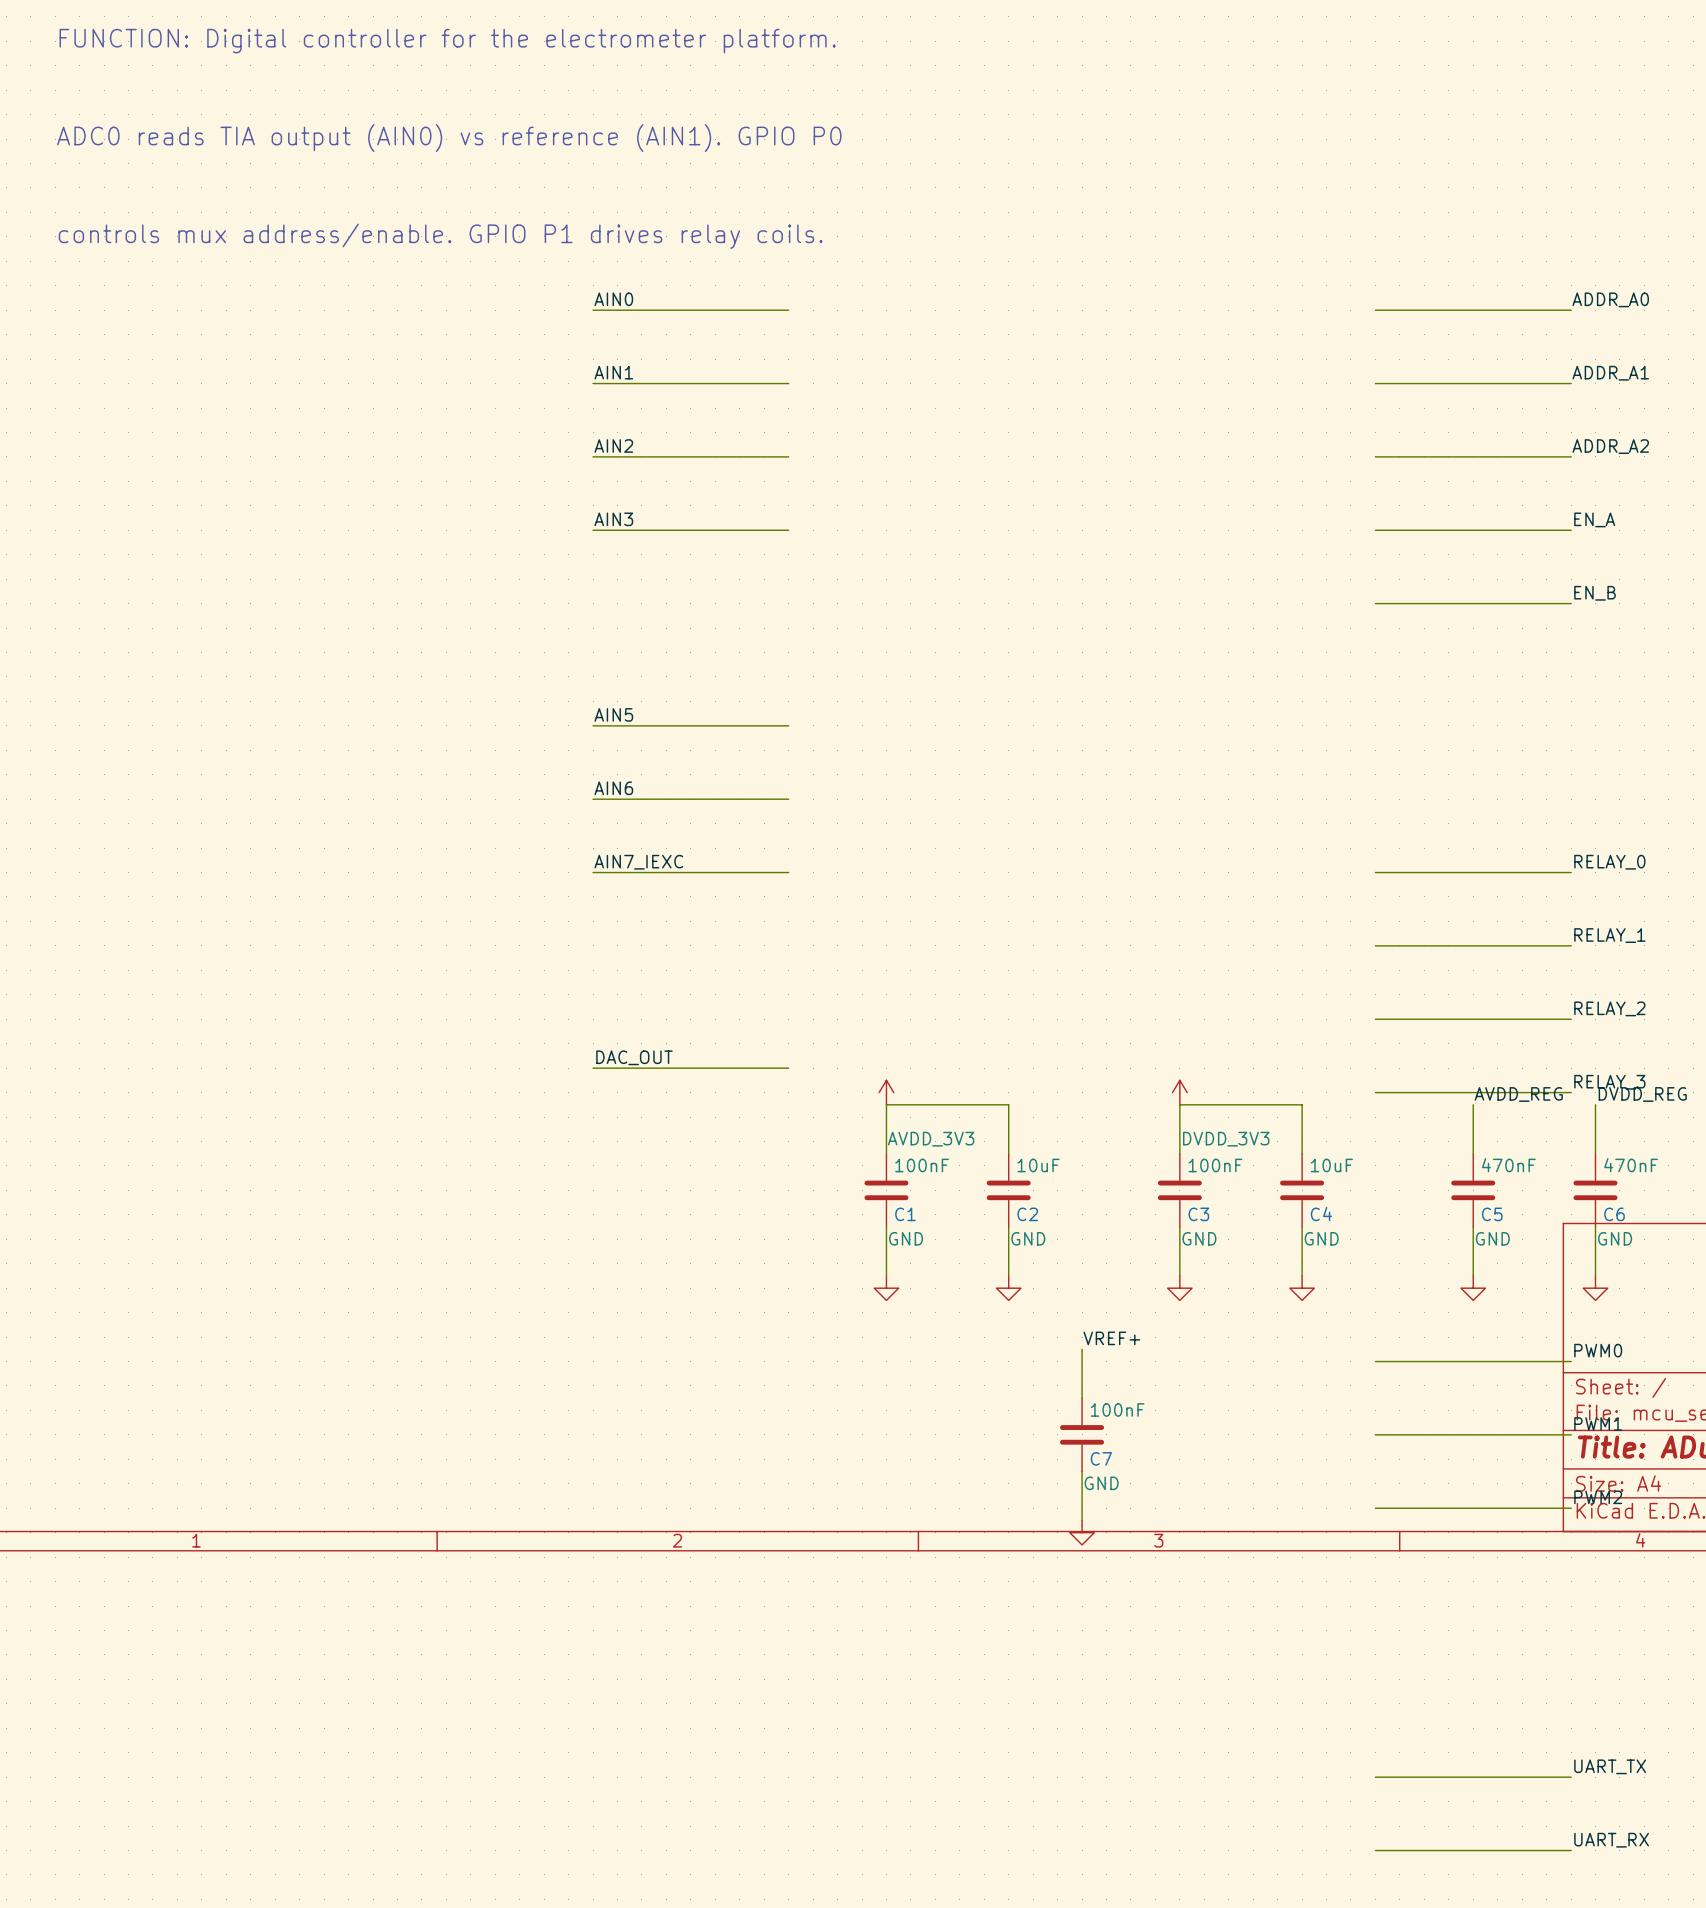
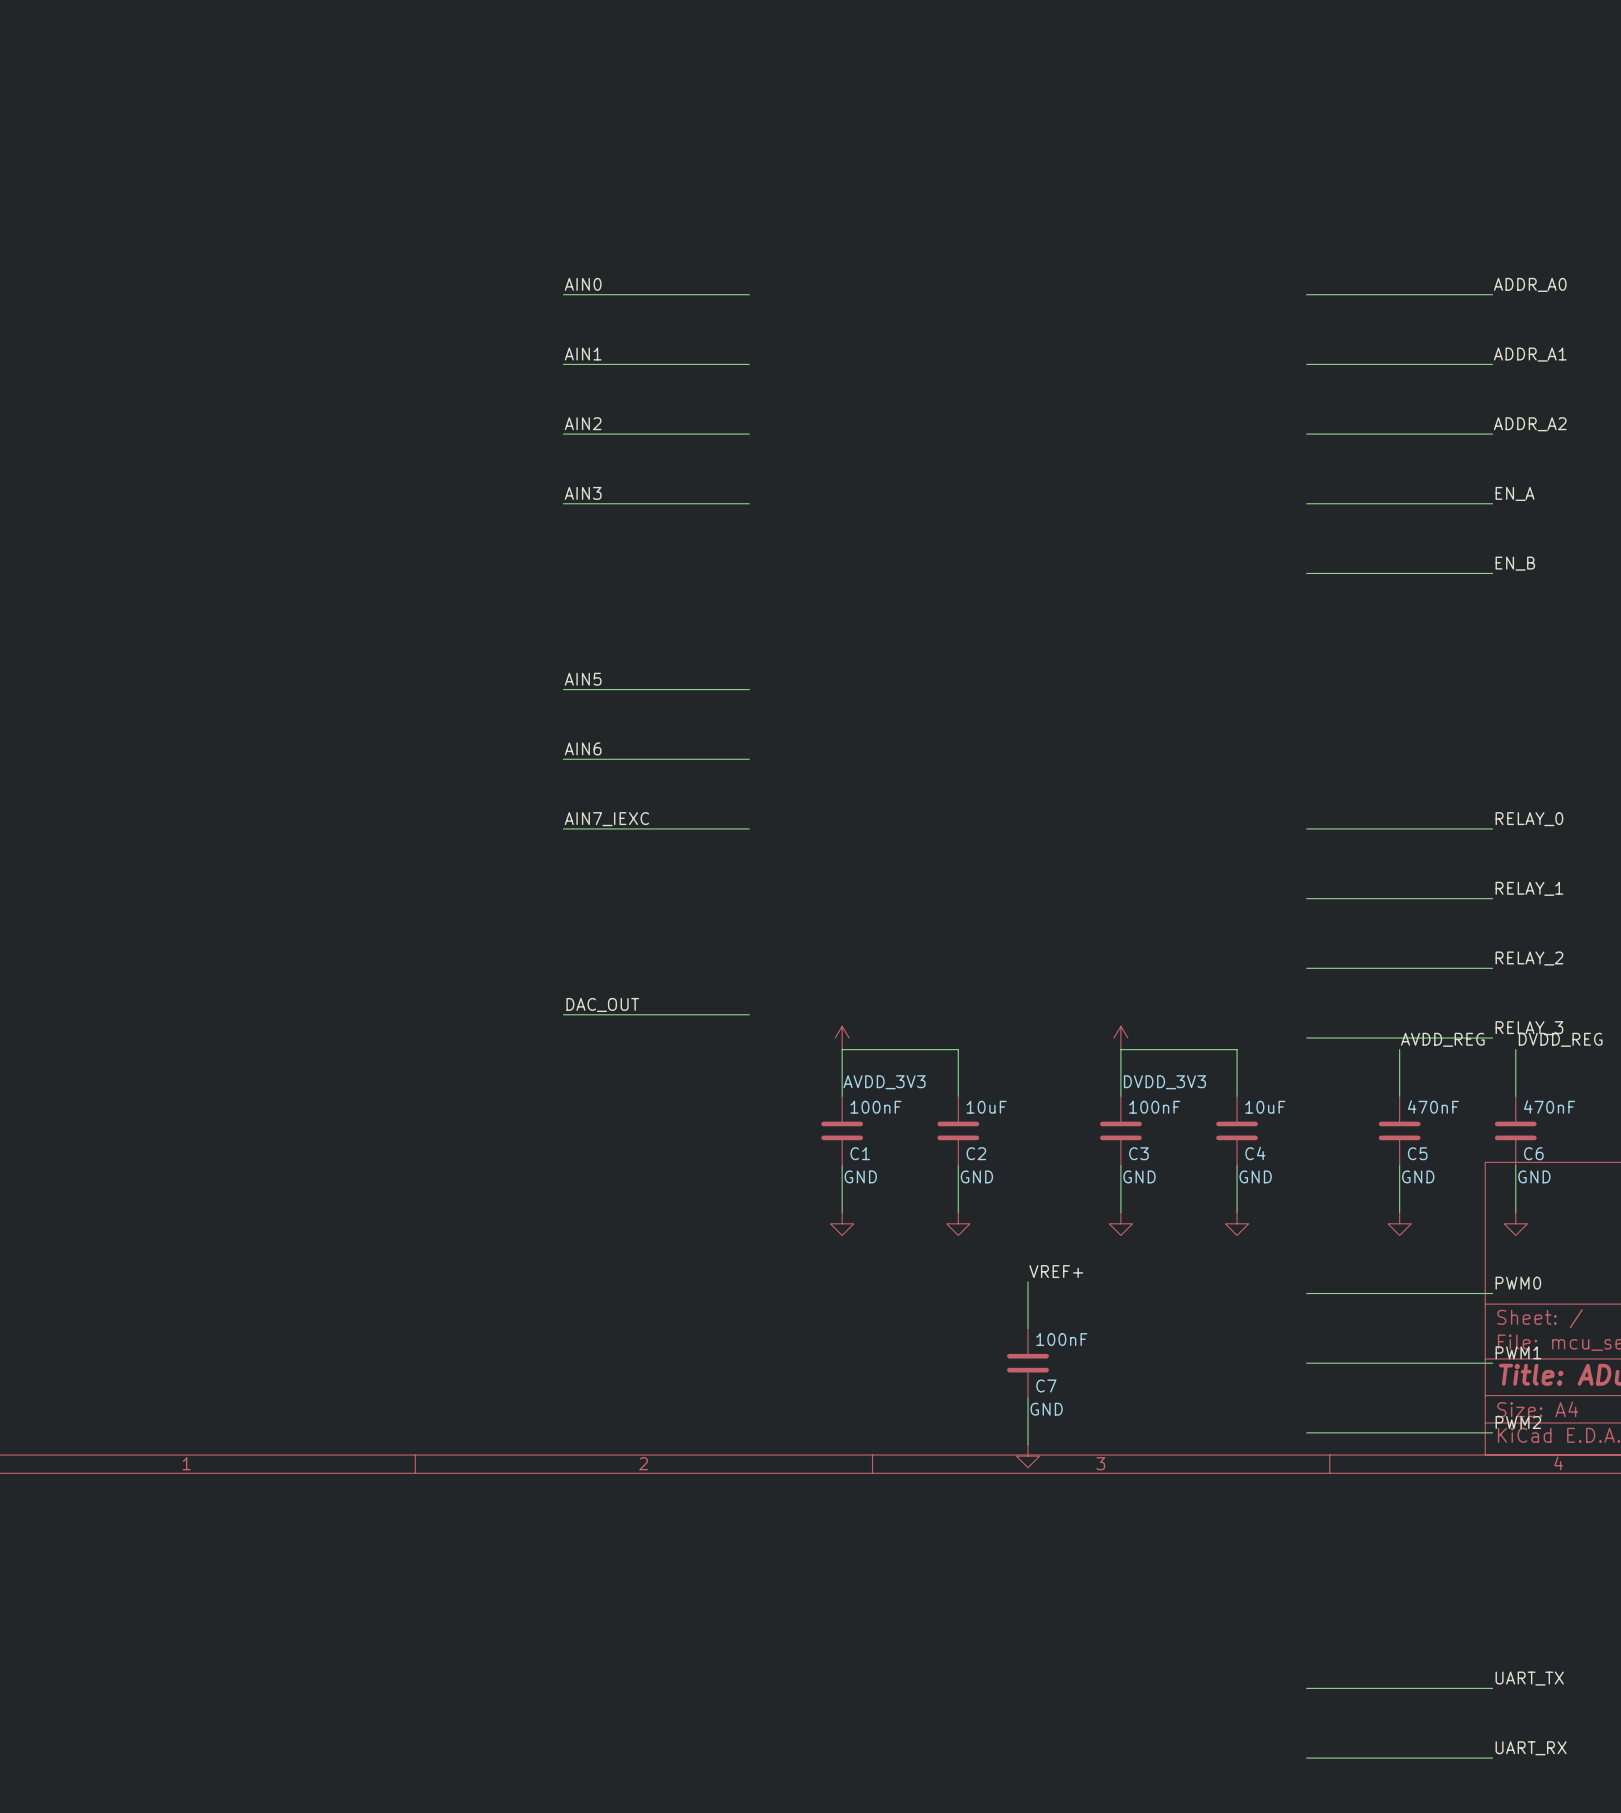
text: FUNCTION: Digital controller for the electrometer platform. (447, 41) -> none
text: ADC0 reads TIA output (AIN0) vs reference (AIN1). GPIO P0 (449, 138) -> none
text: controls mux address/enable. GPIO P1 drives relay coils. (440, 236) -> none

